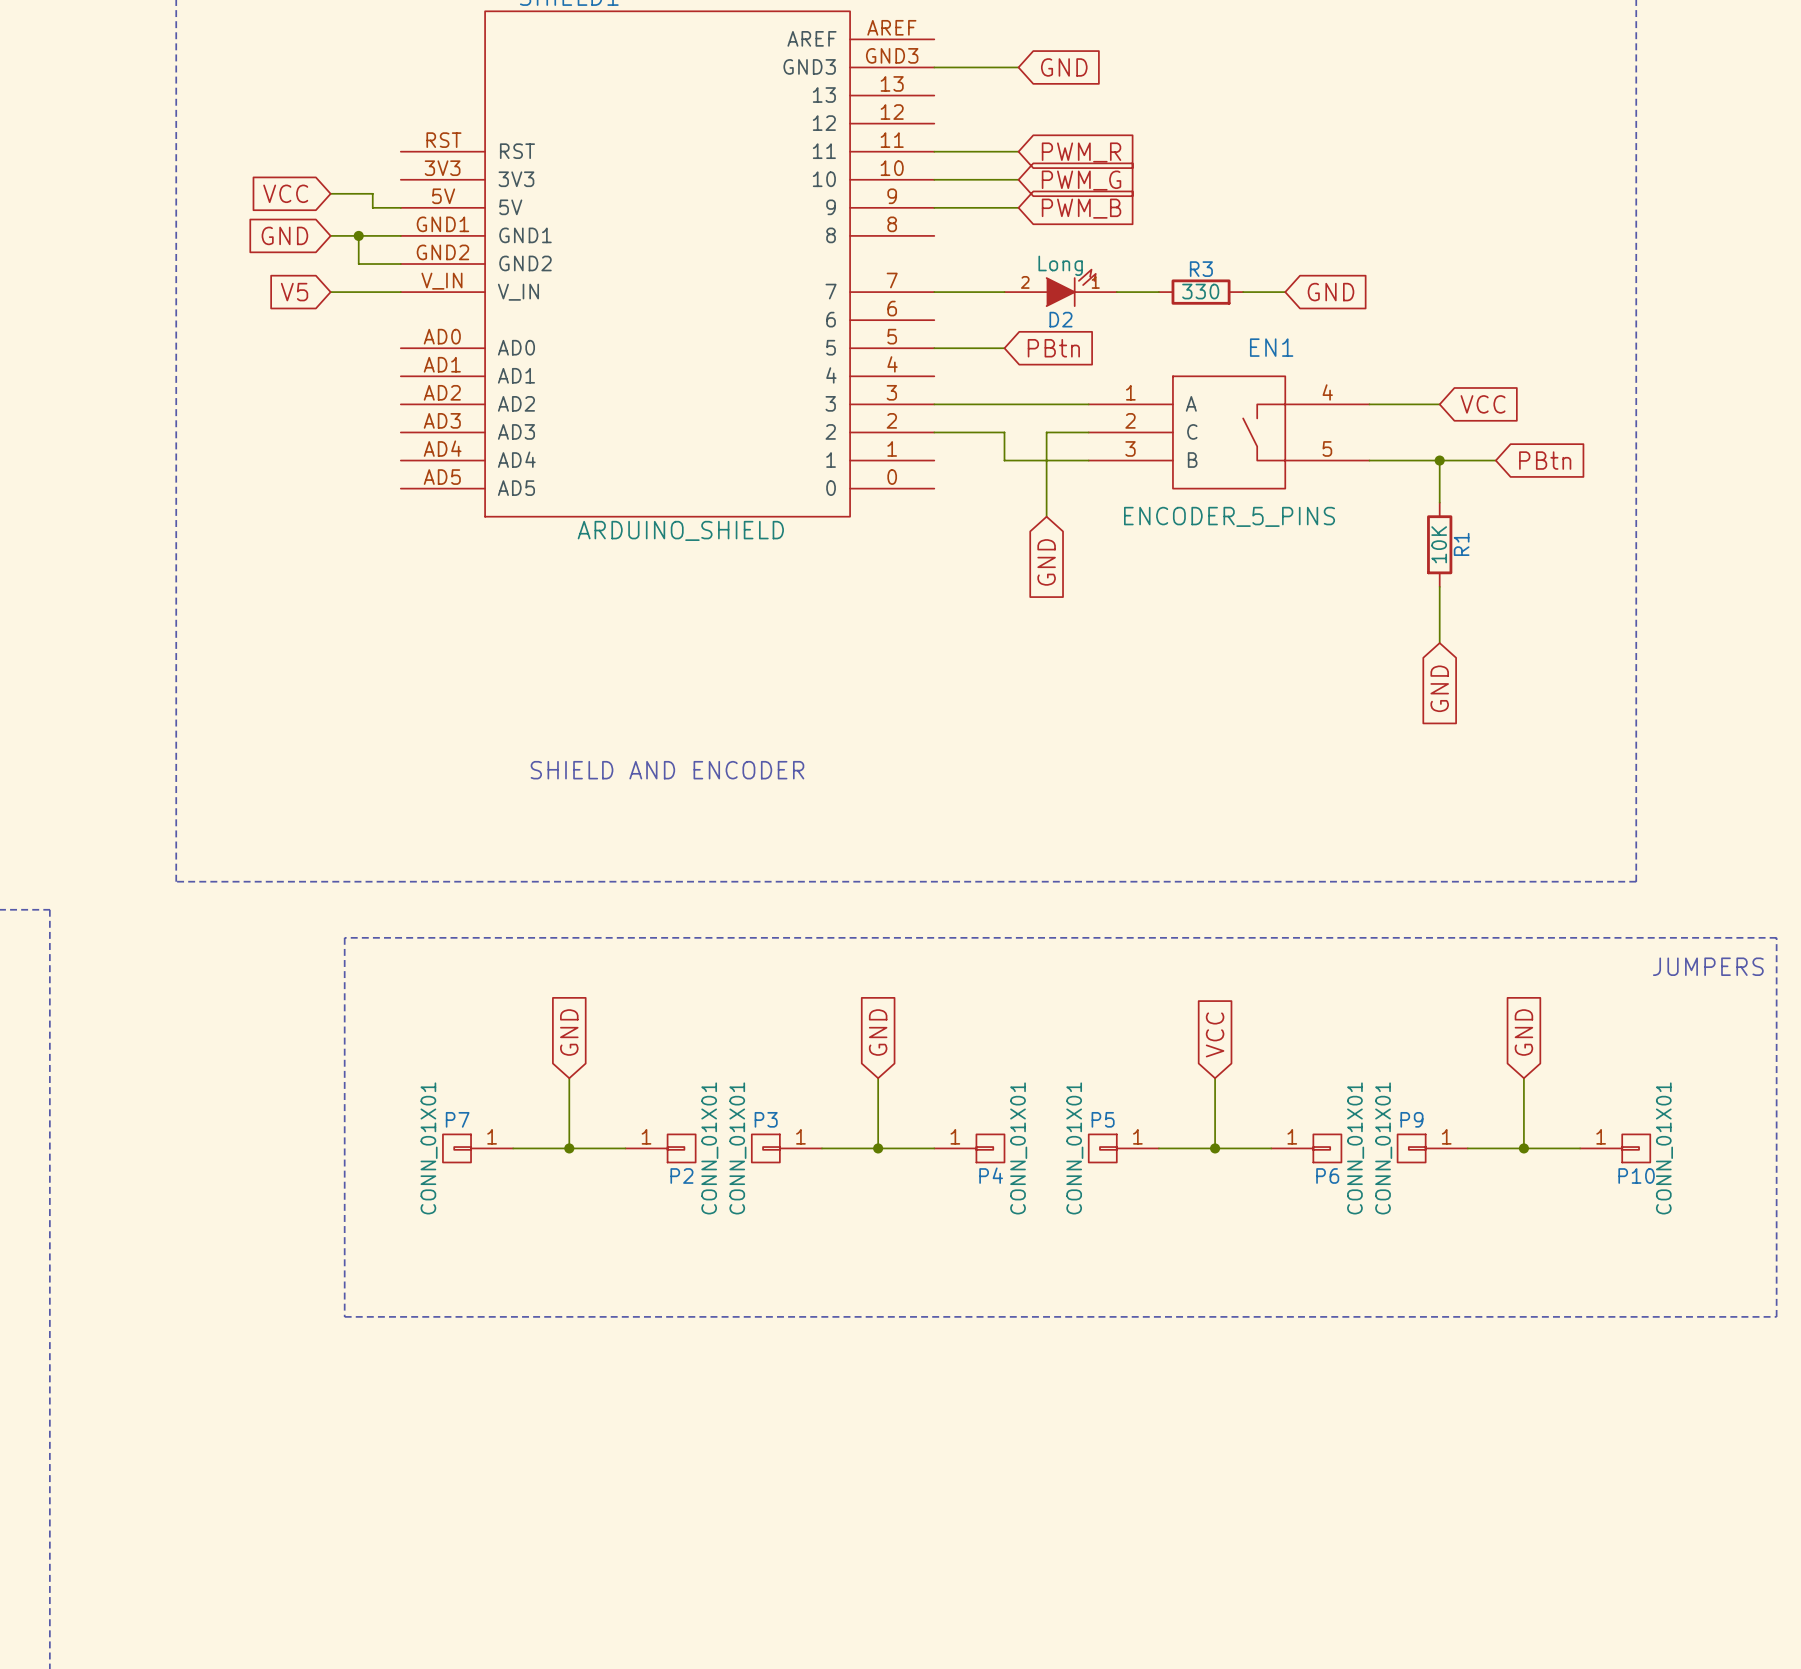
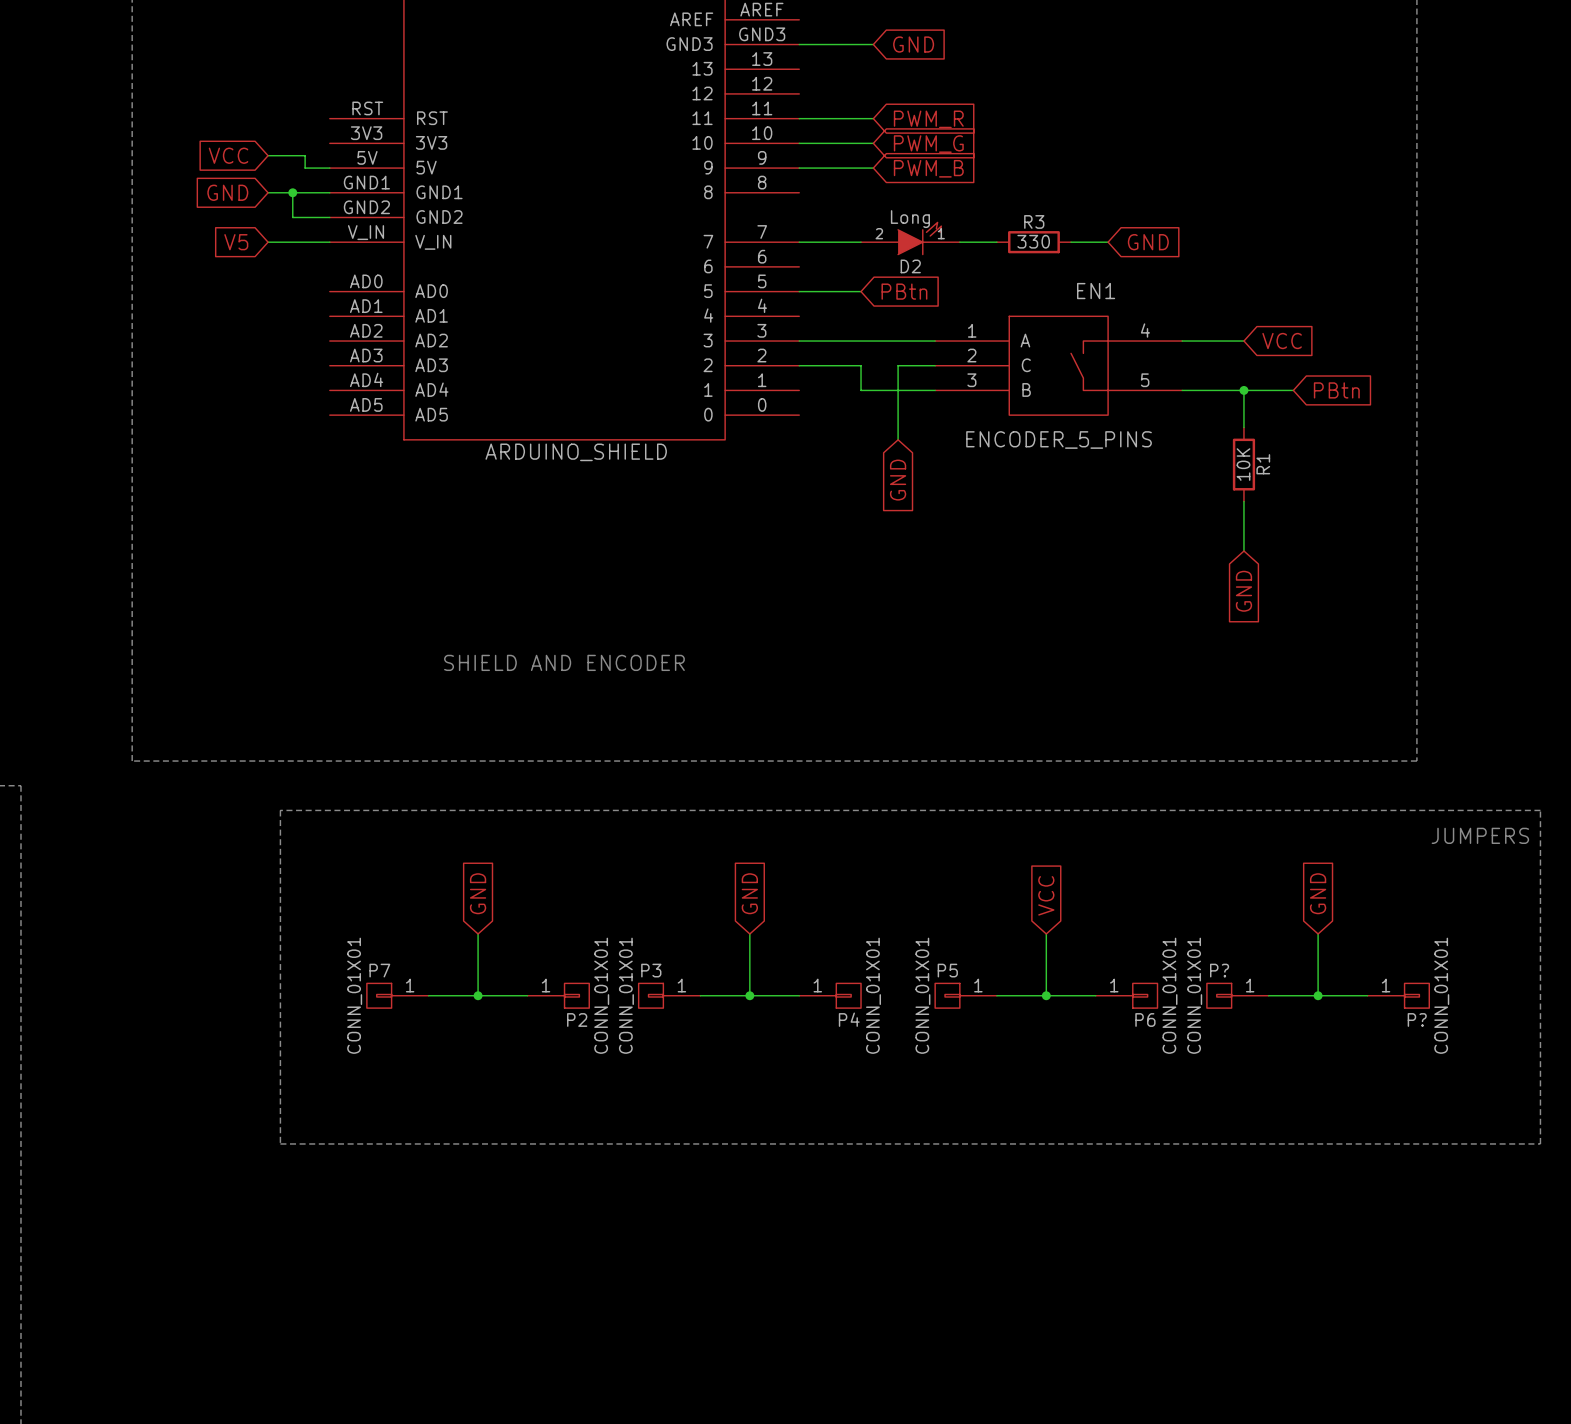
P9 name: P9 (1411, 1119) -> P? (1219, 970)
P10 name: P10 (1636, 1175) -> P? (1417, 1019)

